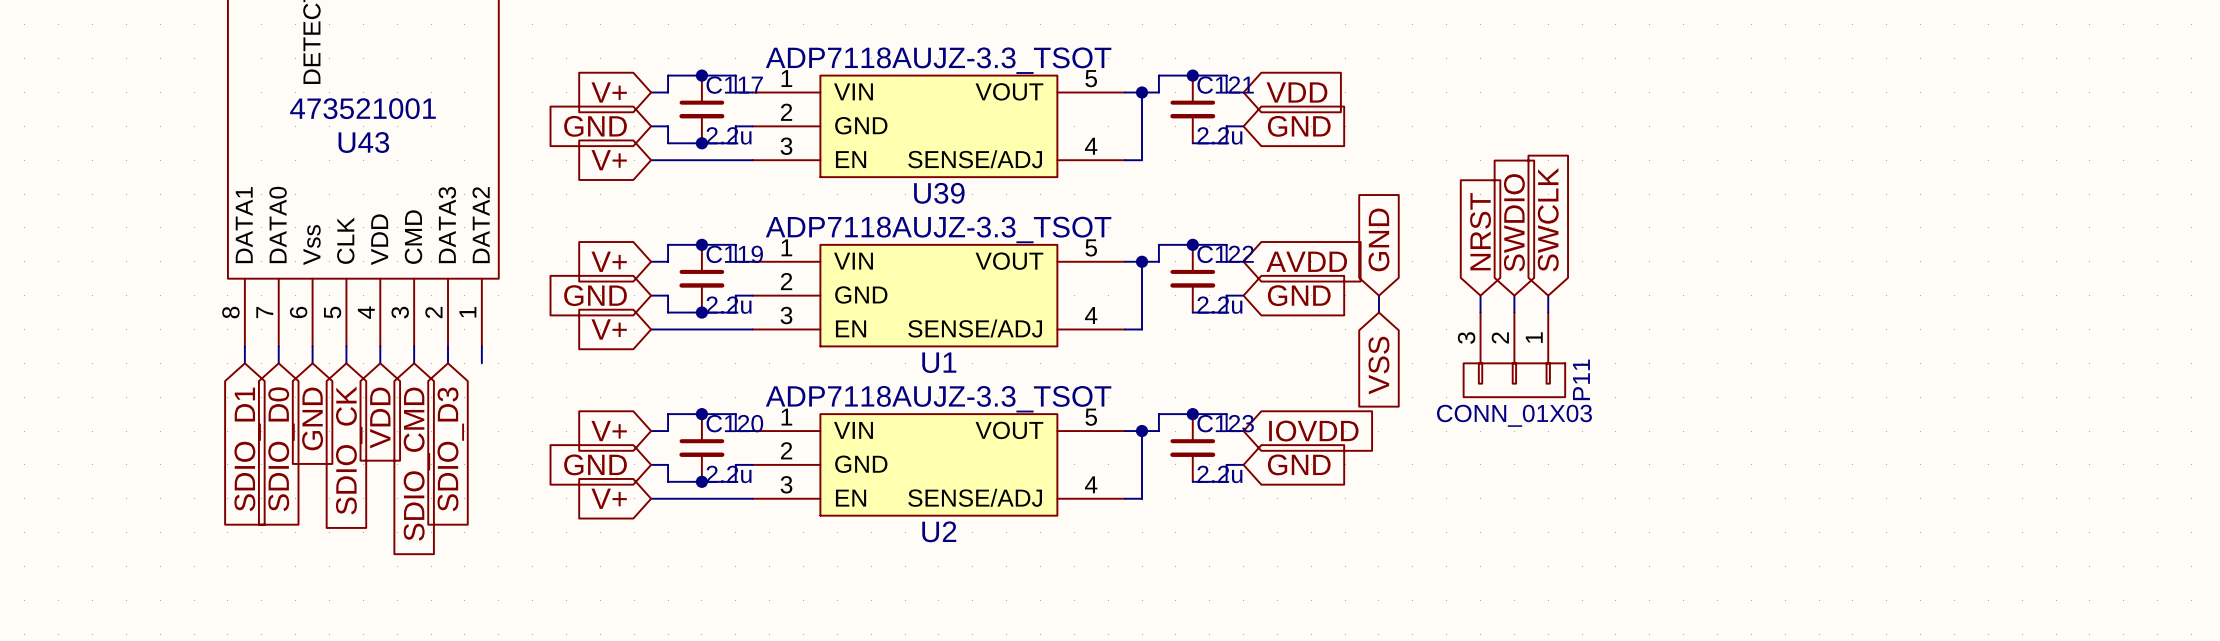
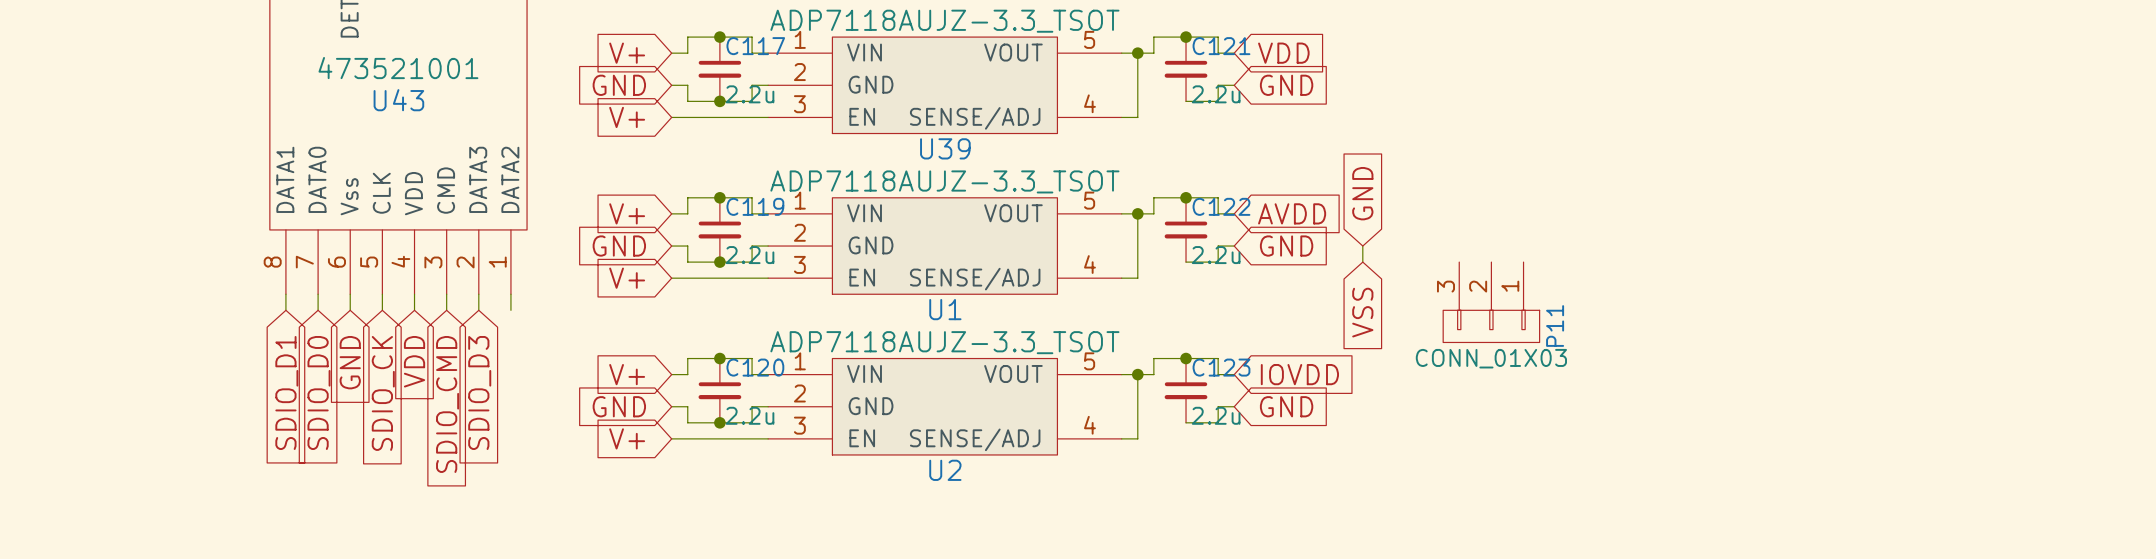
global label: SWCLK (1548, 219) -> none
global label: SWDIO (1514, 222) -> none
global label: NRST (1480, 231) -> none
wire: (1480, 295) (1480, 312) -> none
wire: (1514, 295) (1514, 312) -> none
wire: (1548, 295) (1548, 312) -> none

